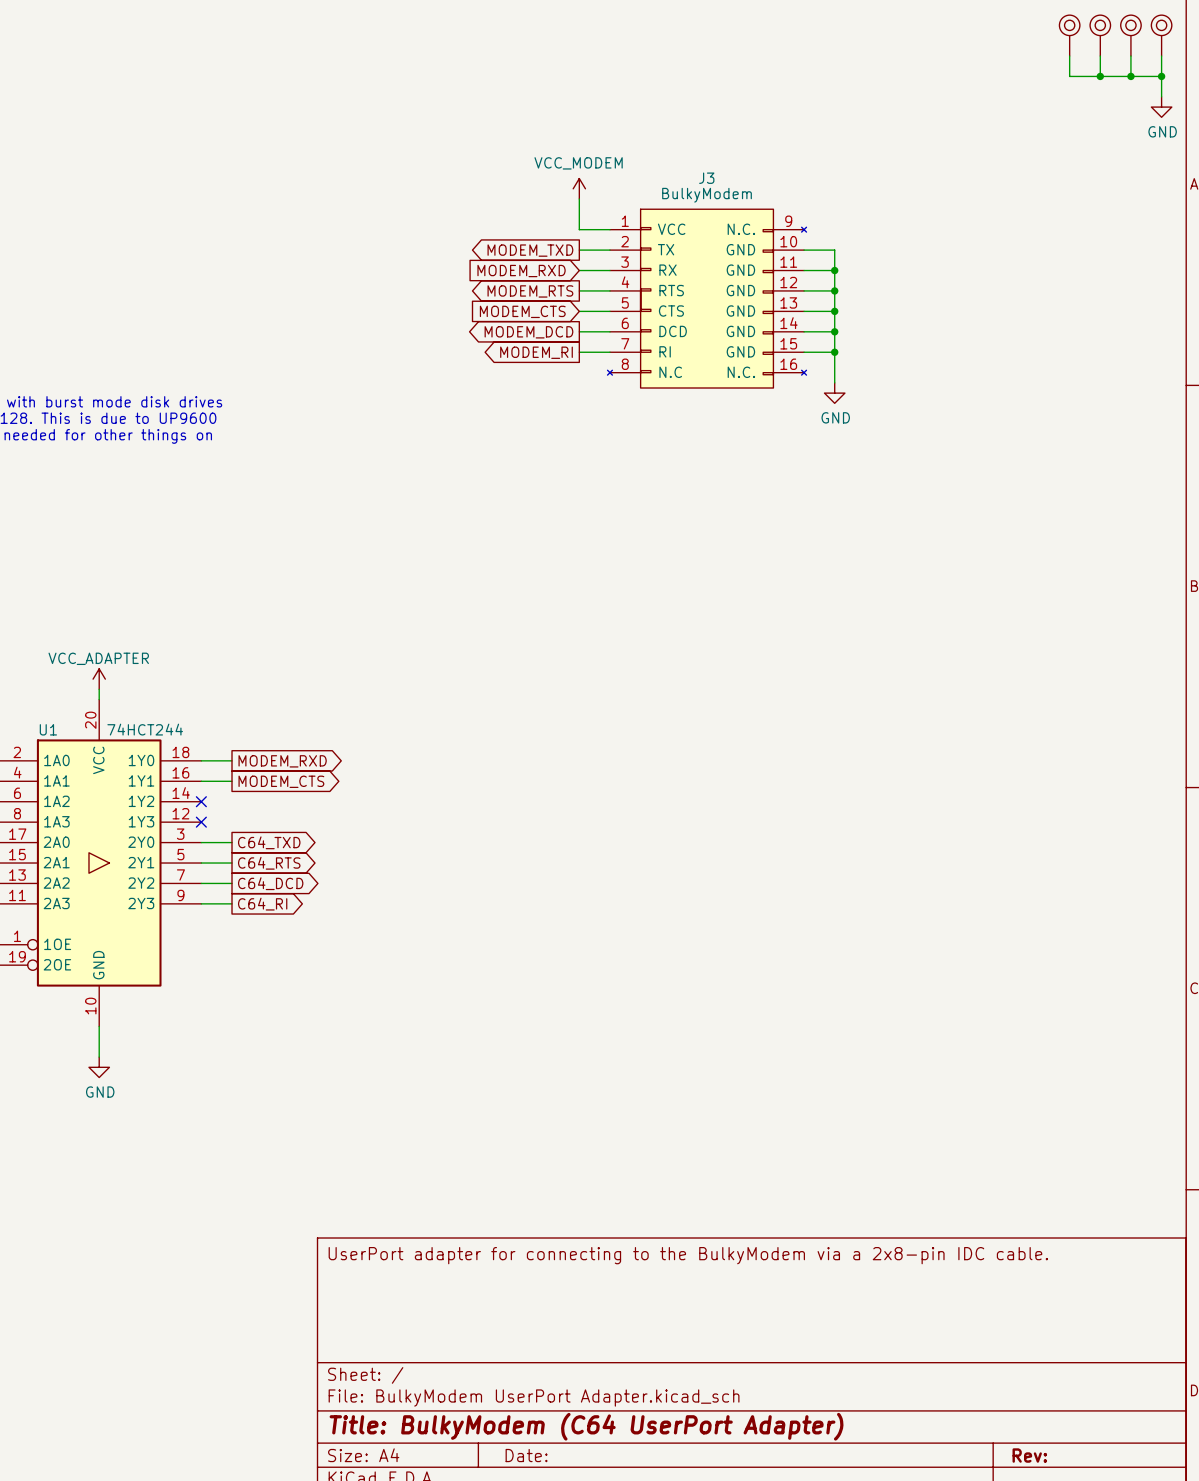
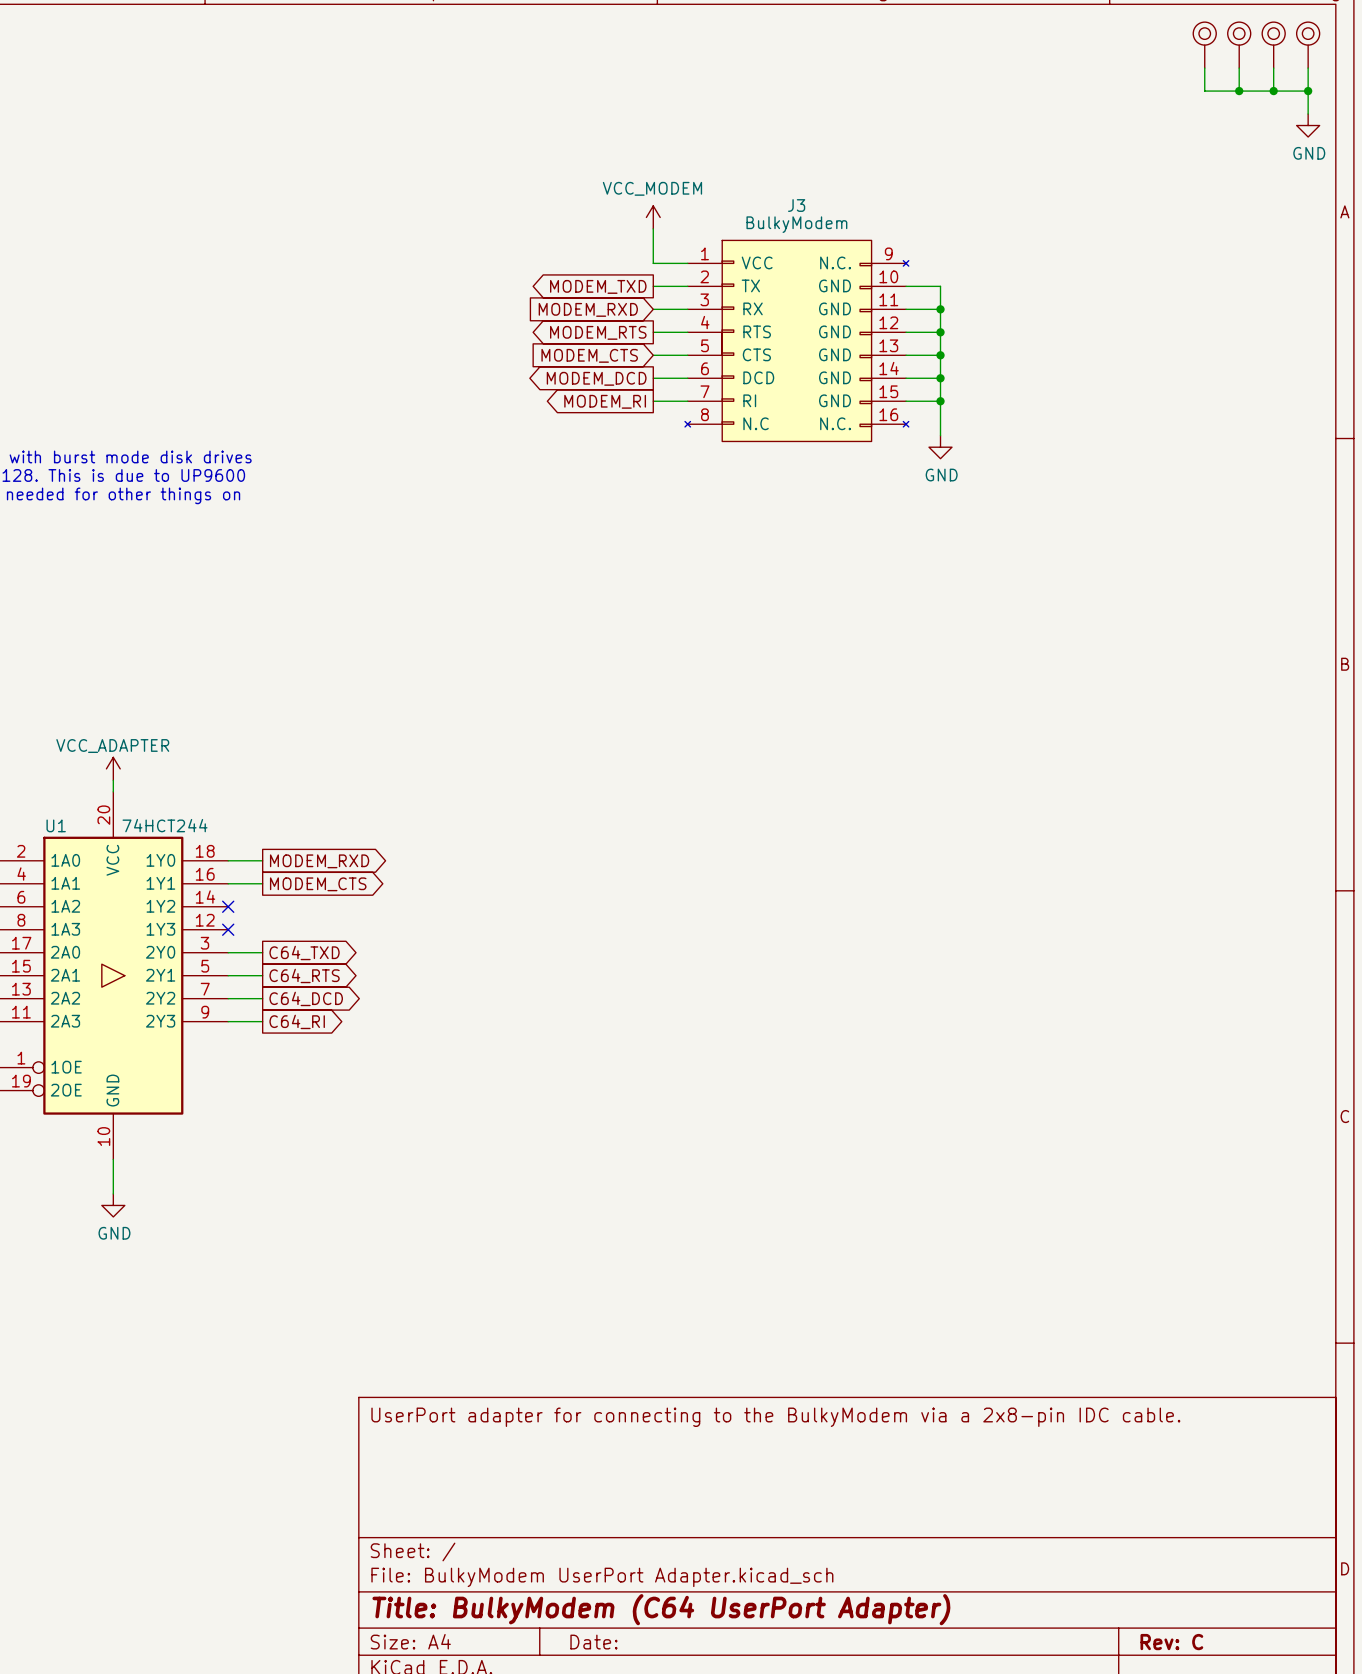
title block: Rev: (1029, 1455) -> Rev: C (1171, 1642)

